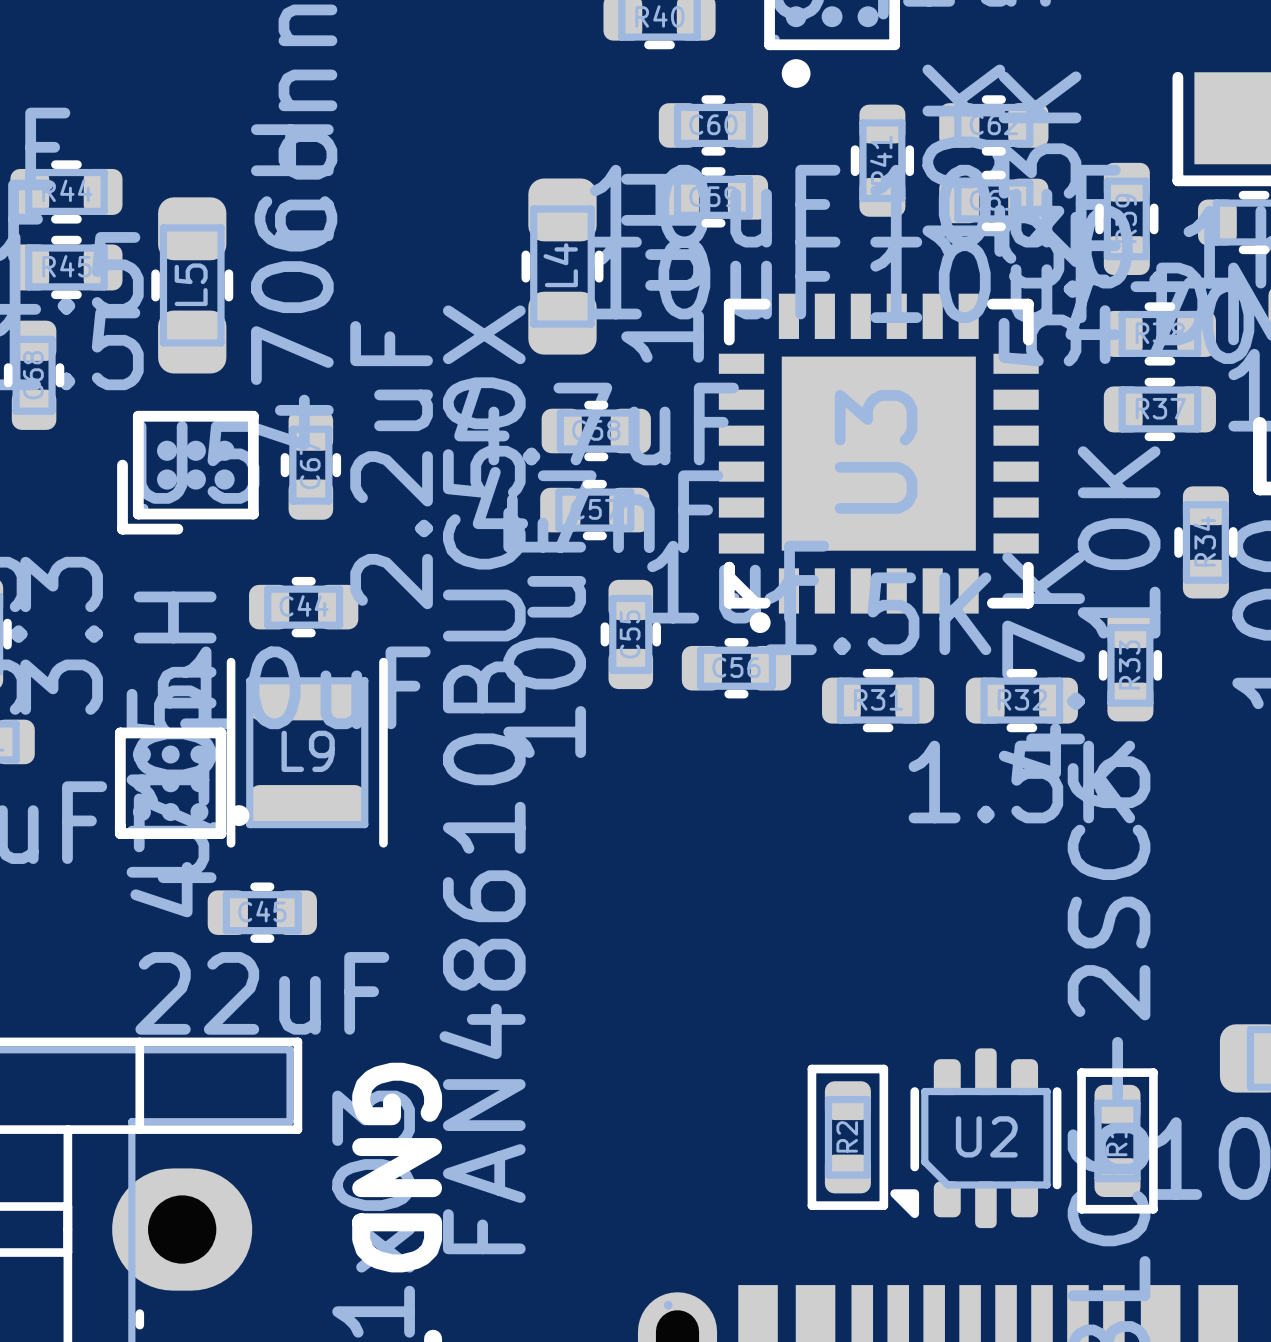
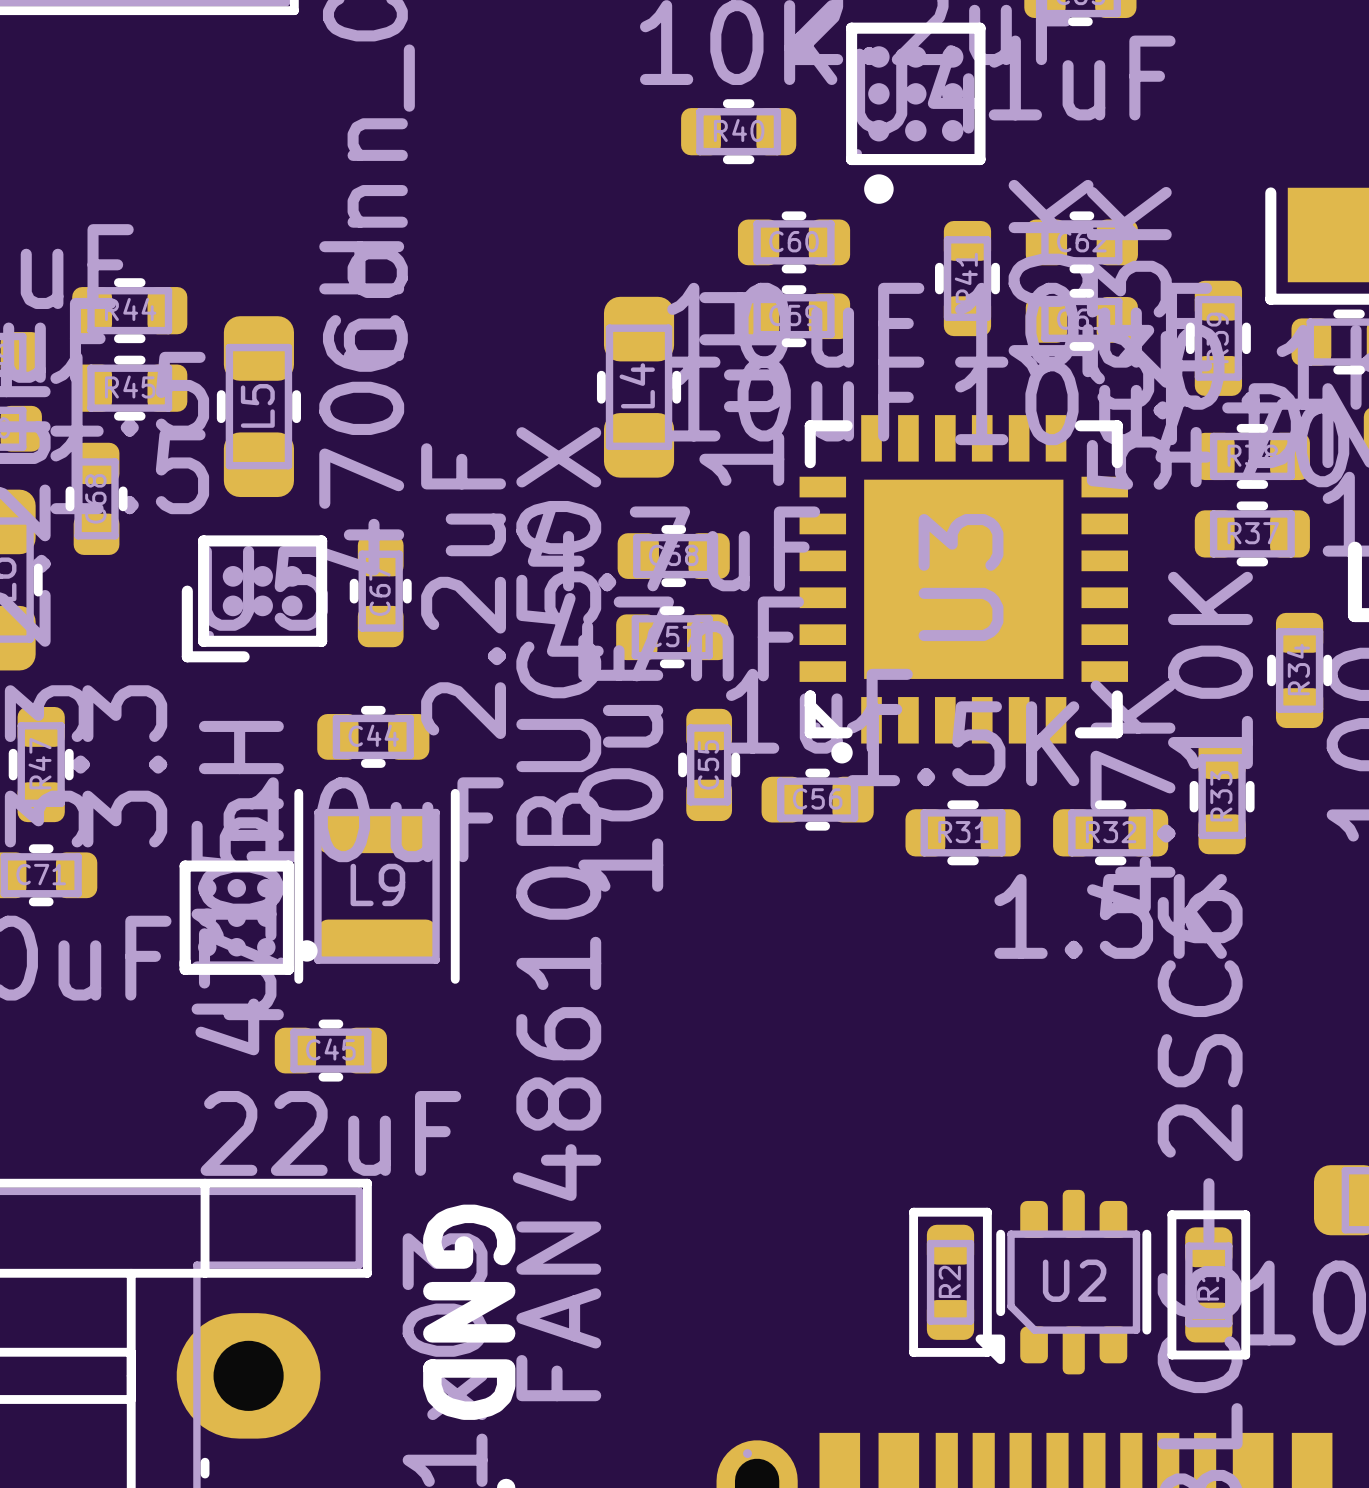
R2 position: (847, 1137) -> (950, 1282)

